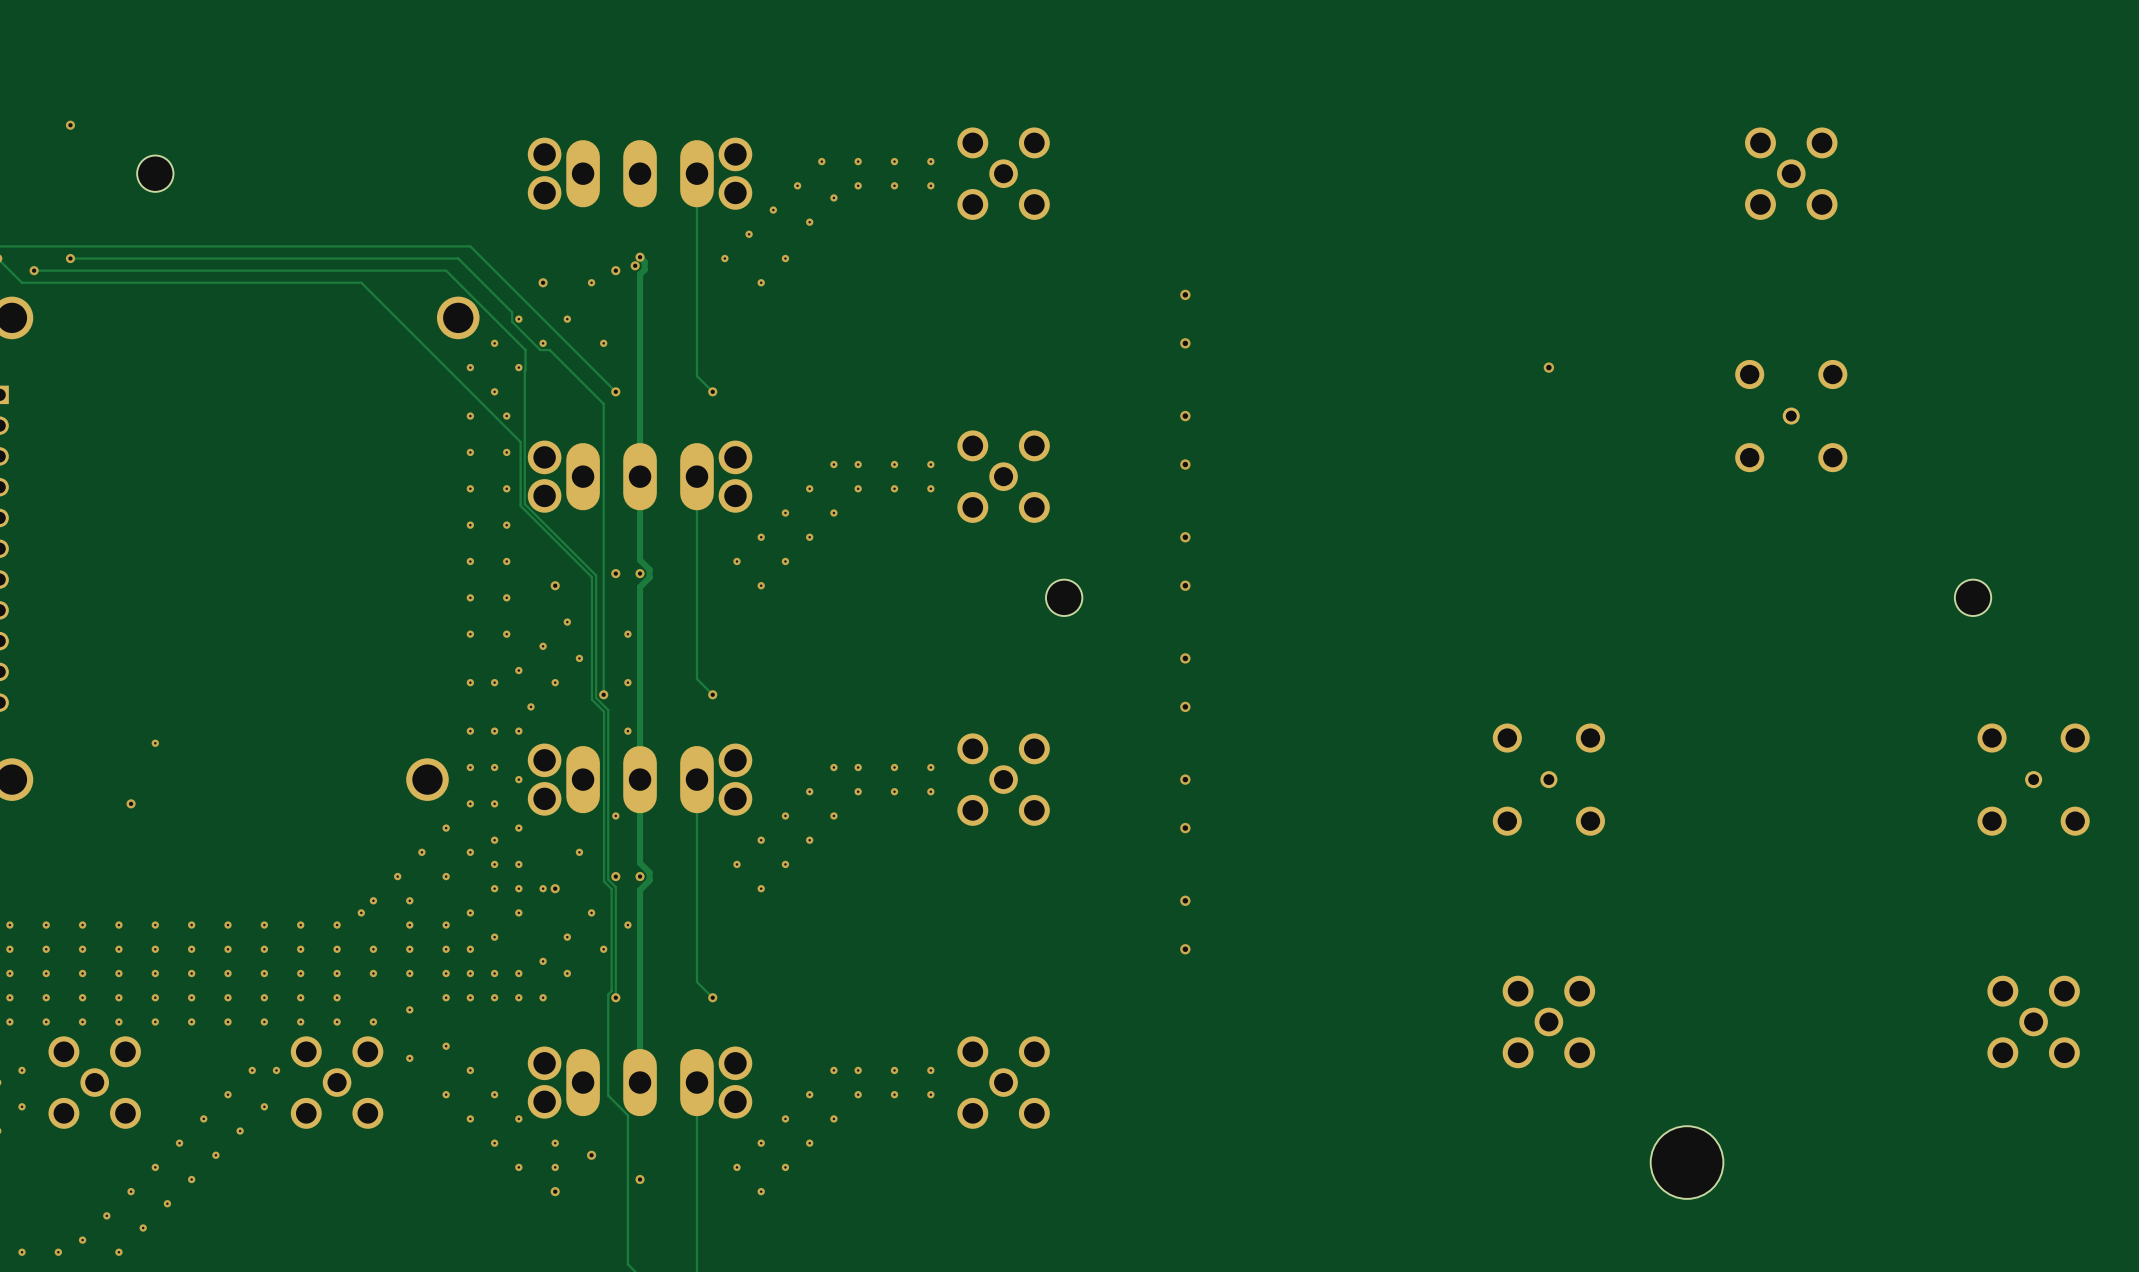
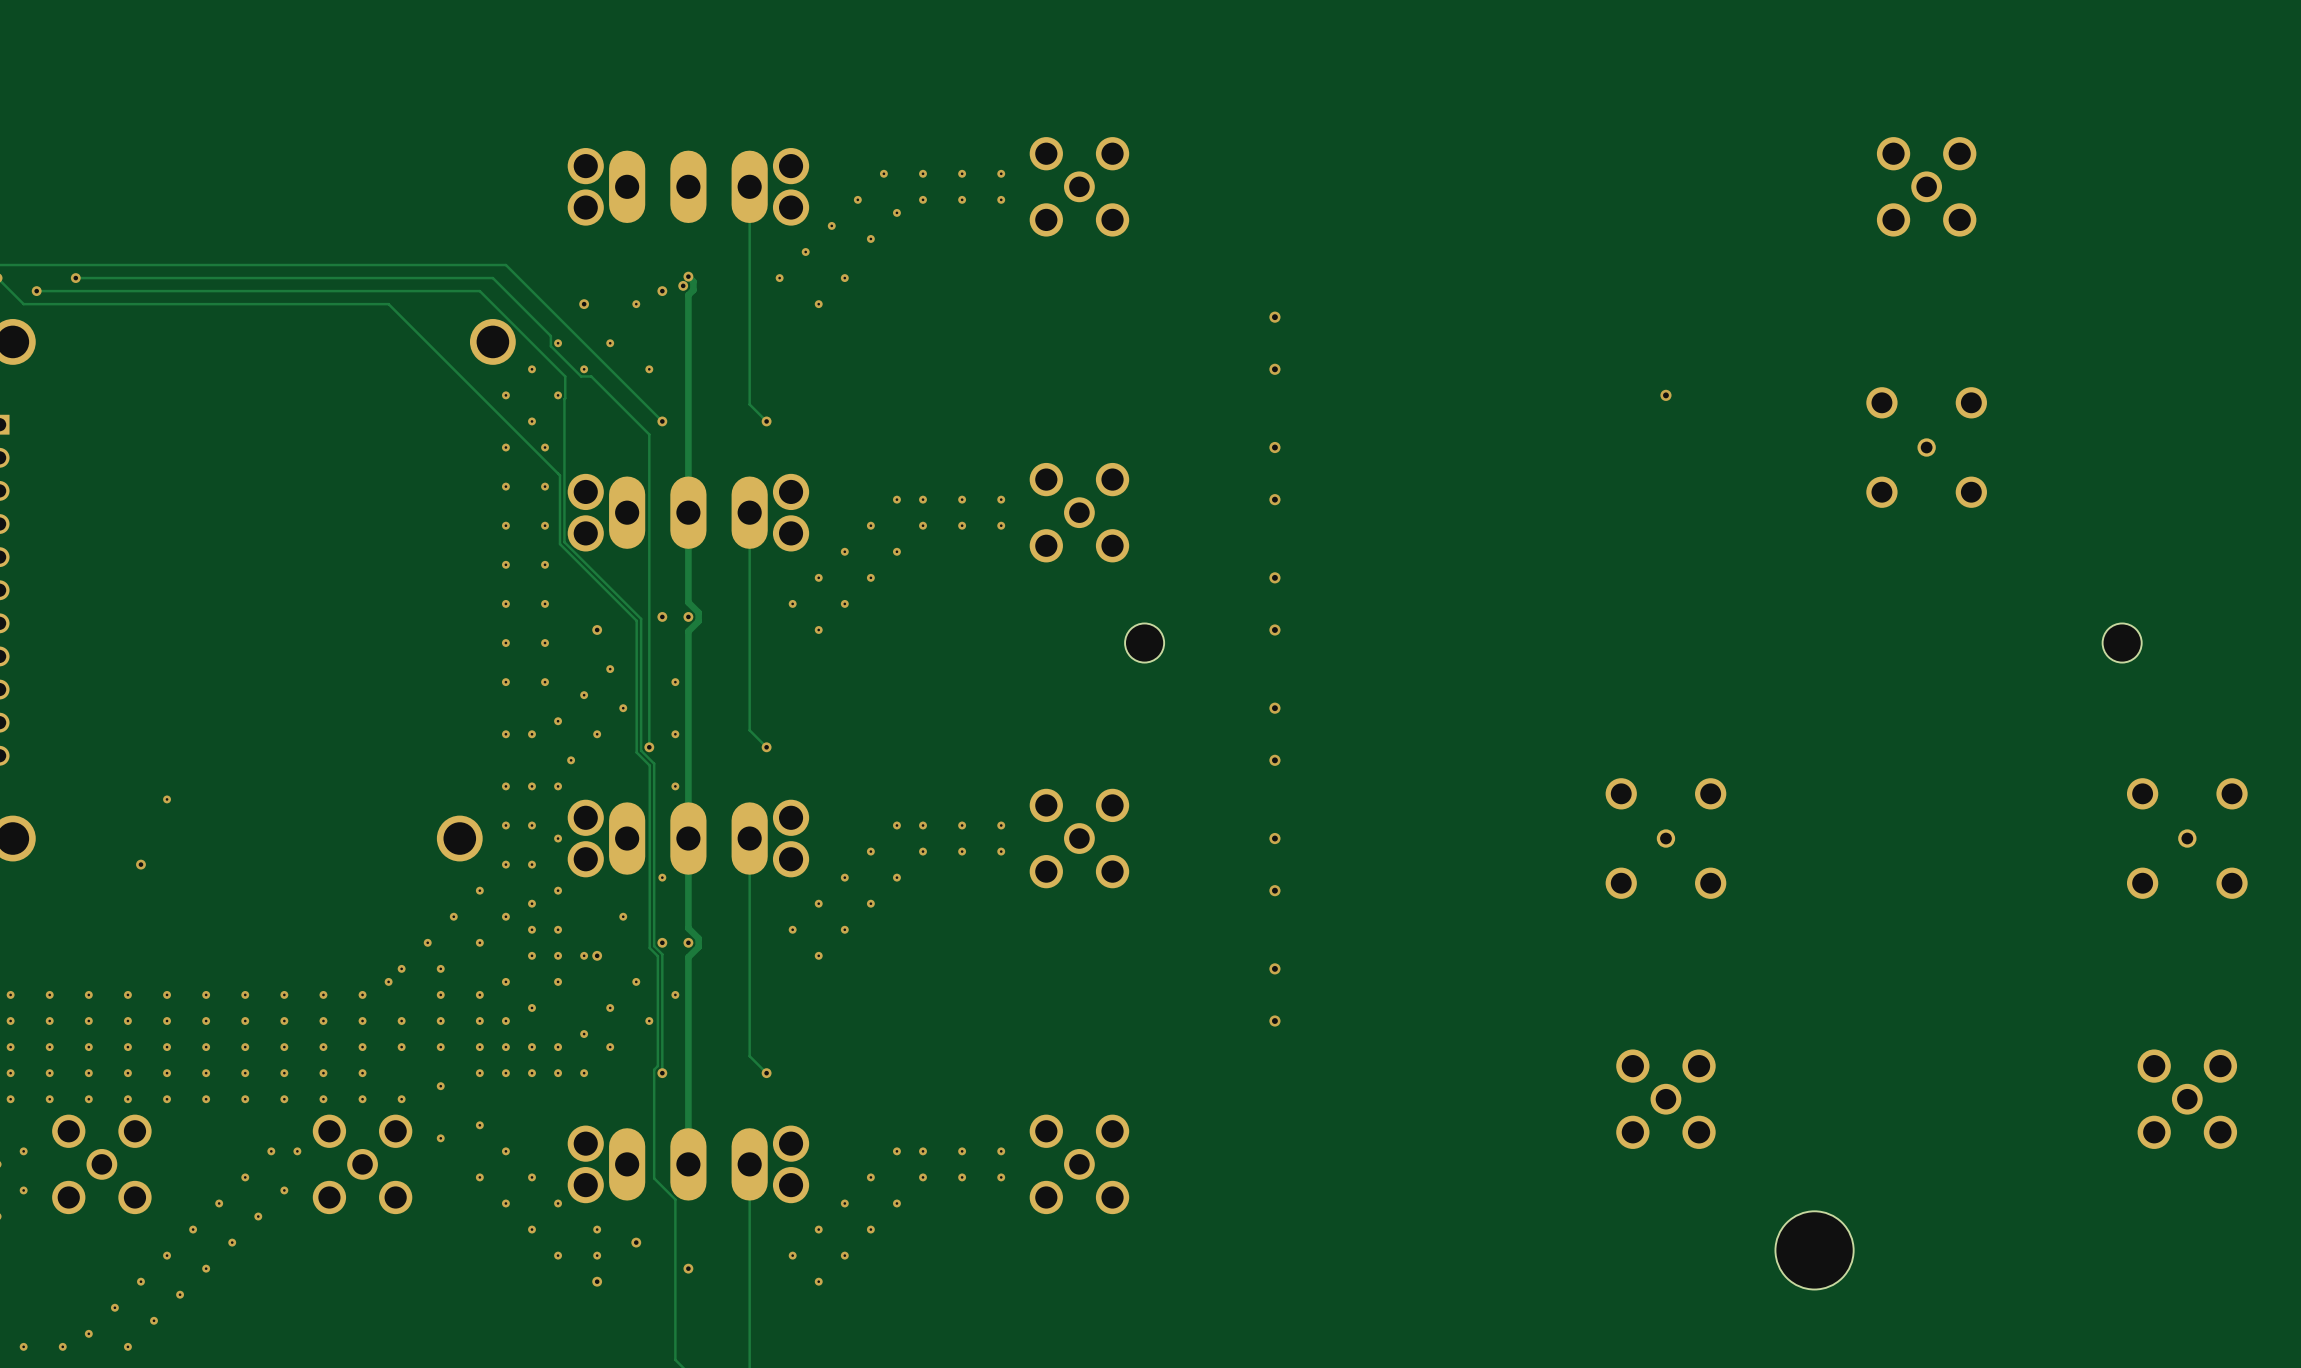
via: (70, 125) -> none
hole: (155, 173) -> none

